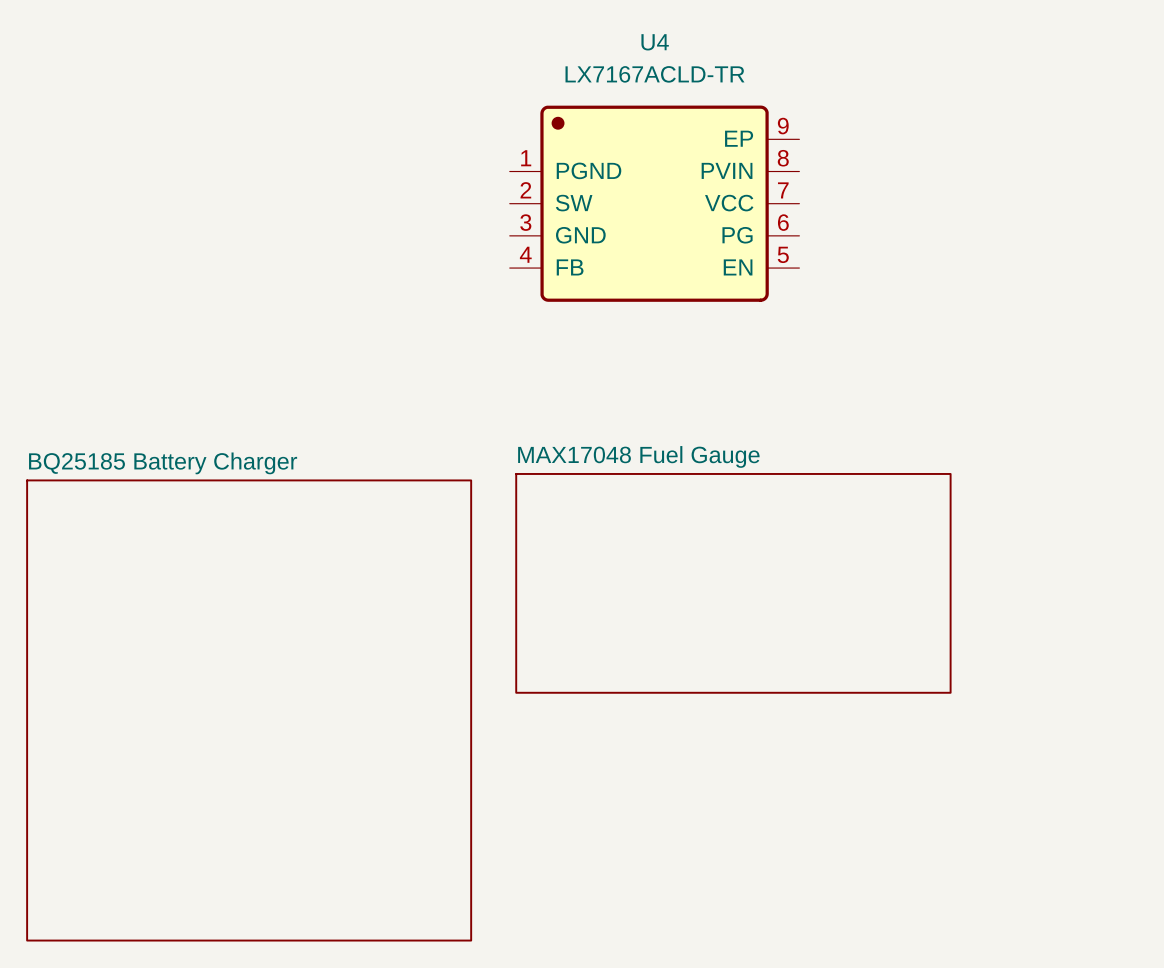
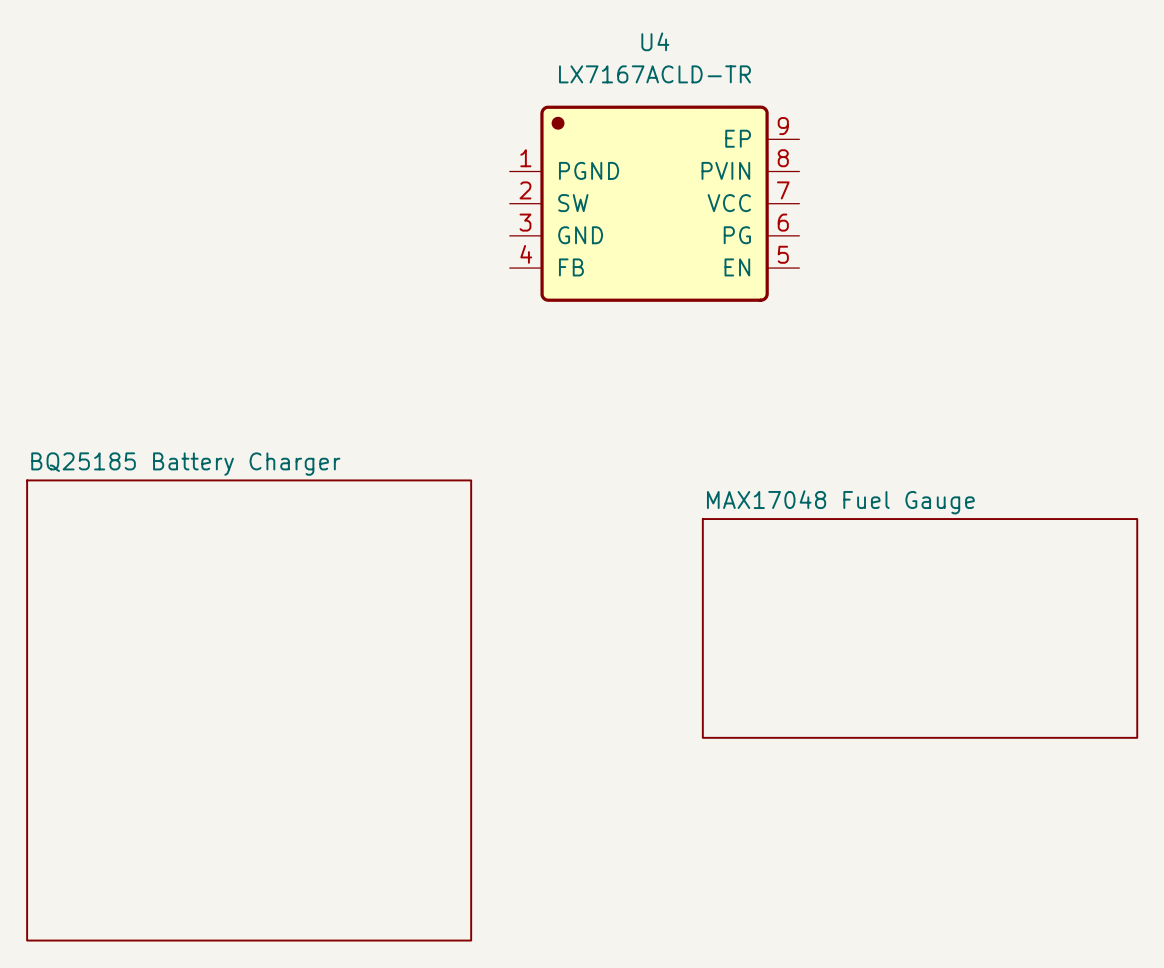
sheet MAX17048 Fuel Gauge position: (733, 583) -> (920, 628)

